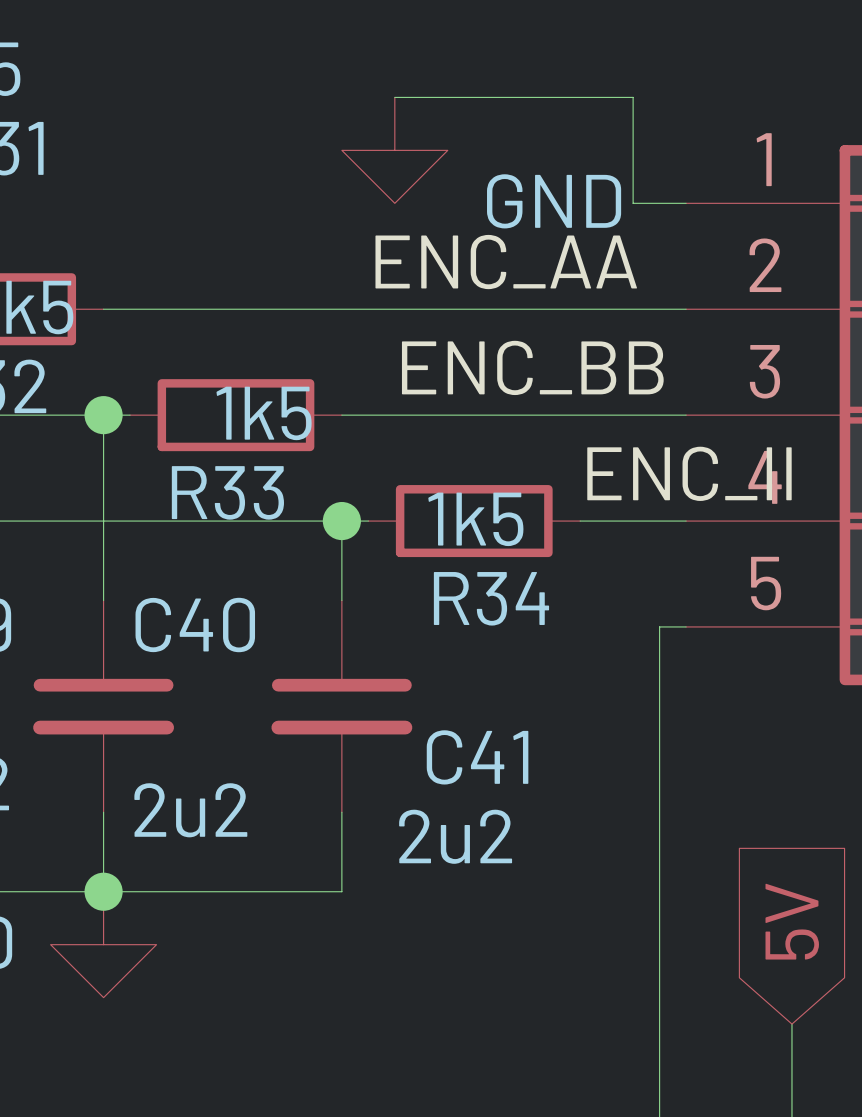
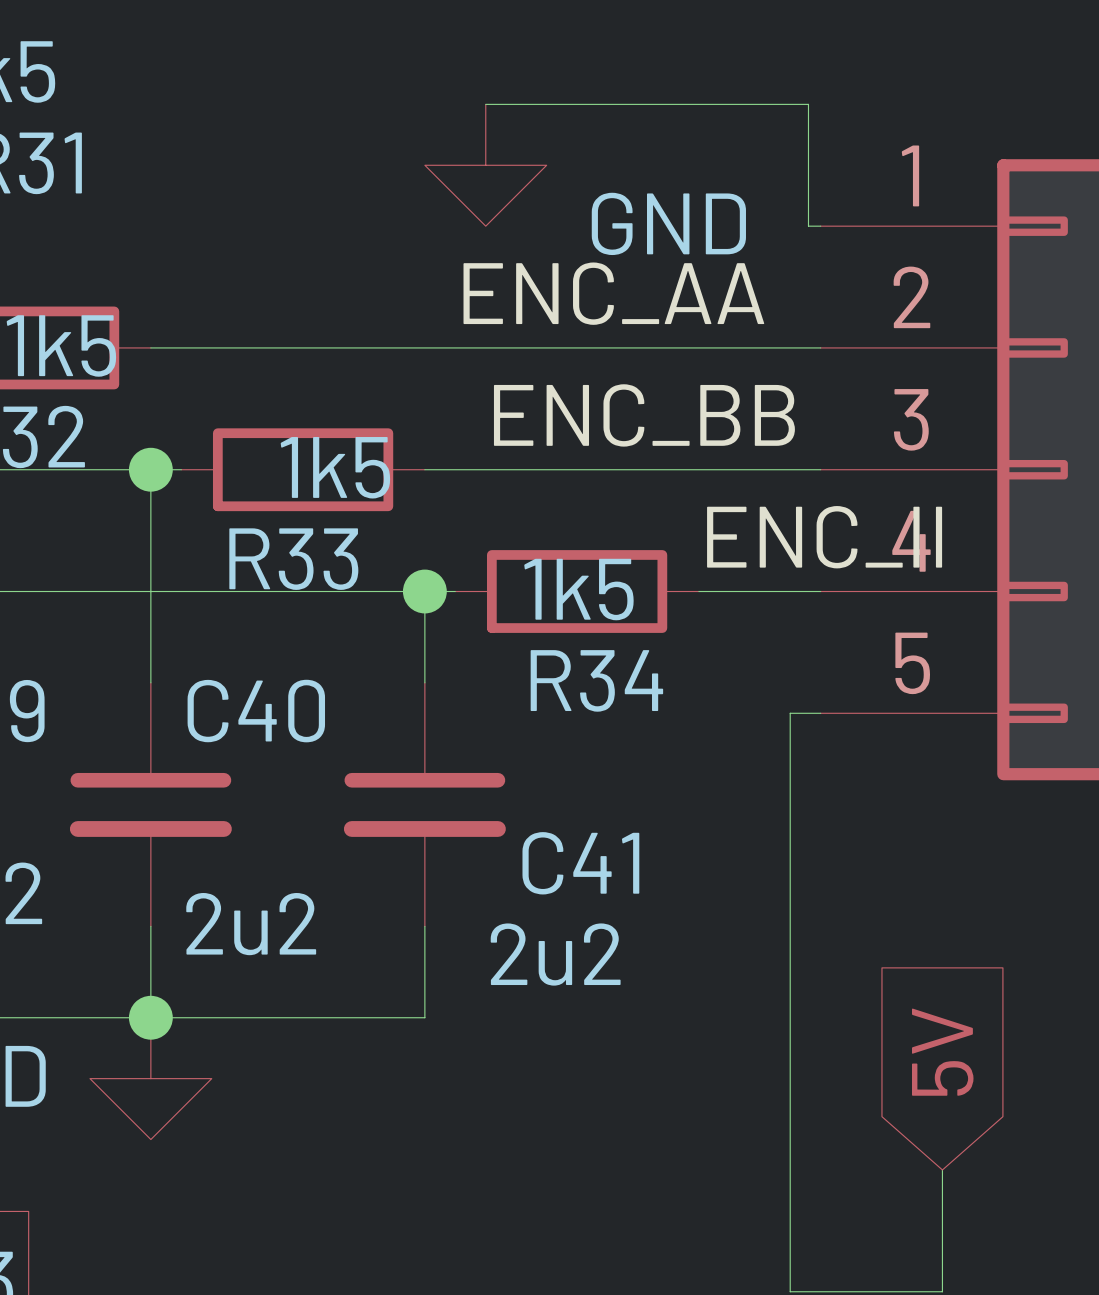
wire: (633, 97) (633, 203) (675, 203) -> (759, 104) (808, 104) (808, 226)

